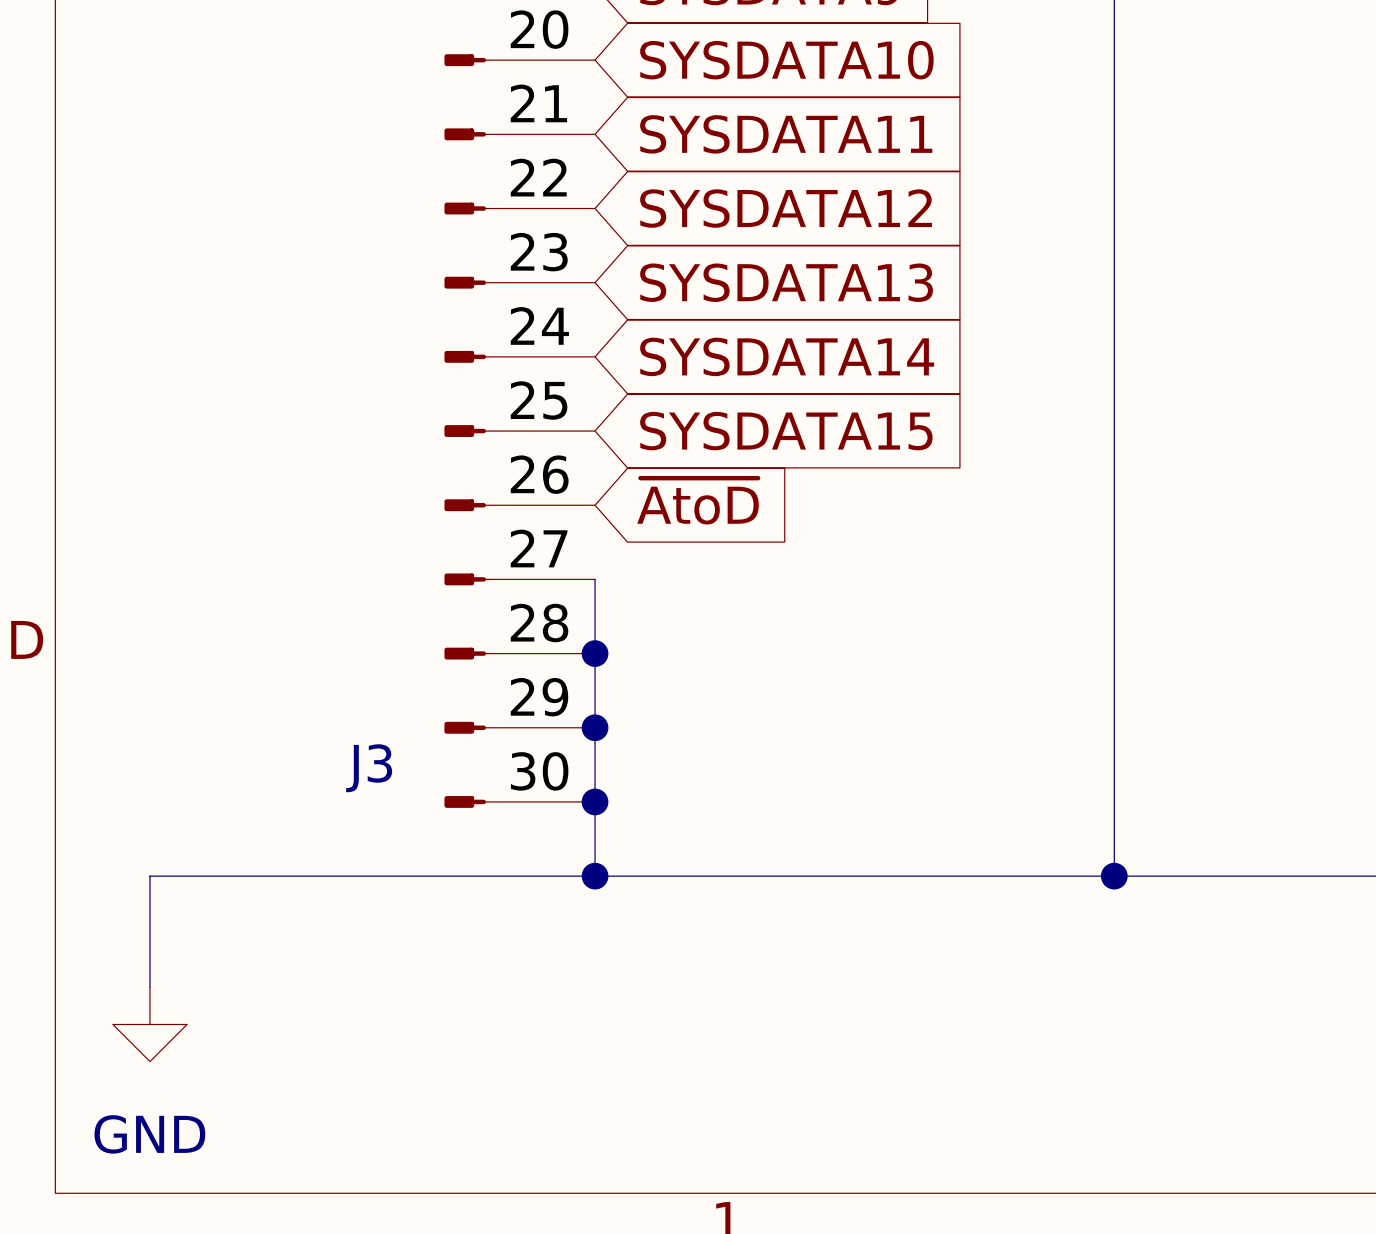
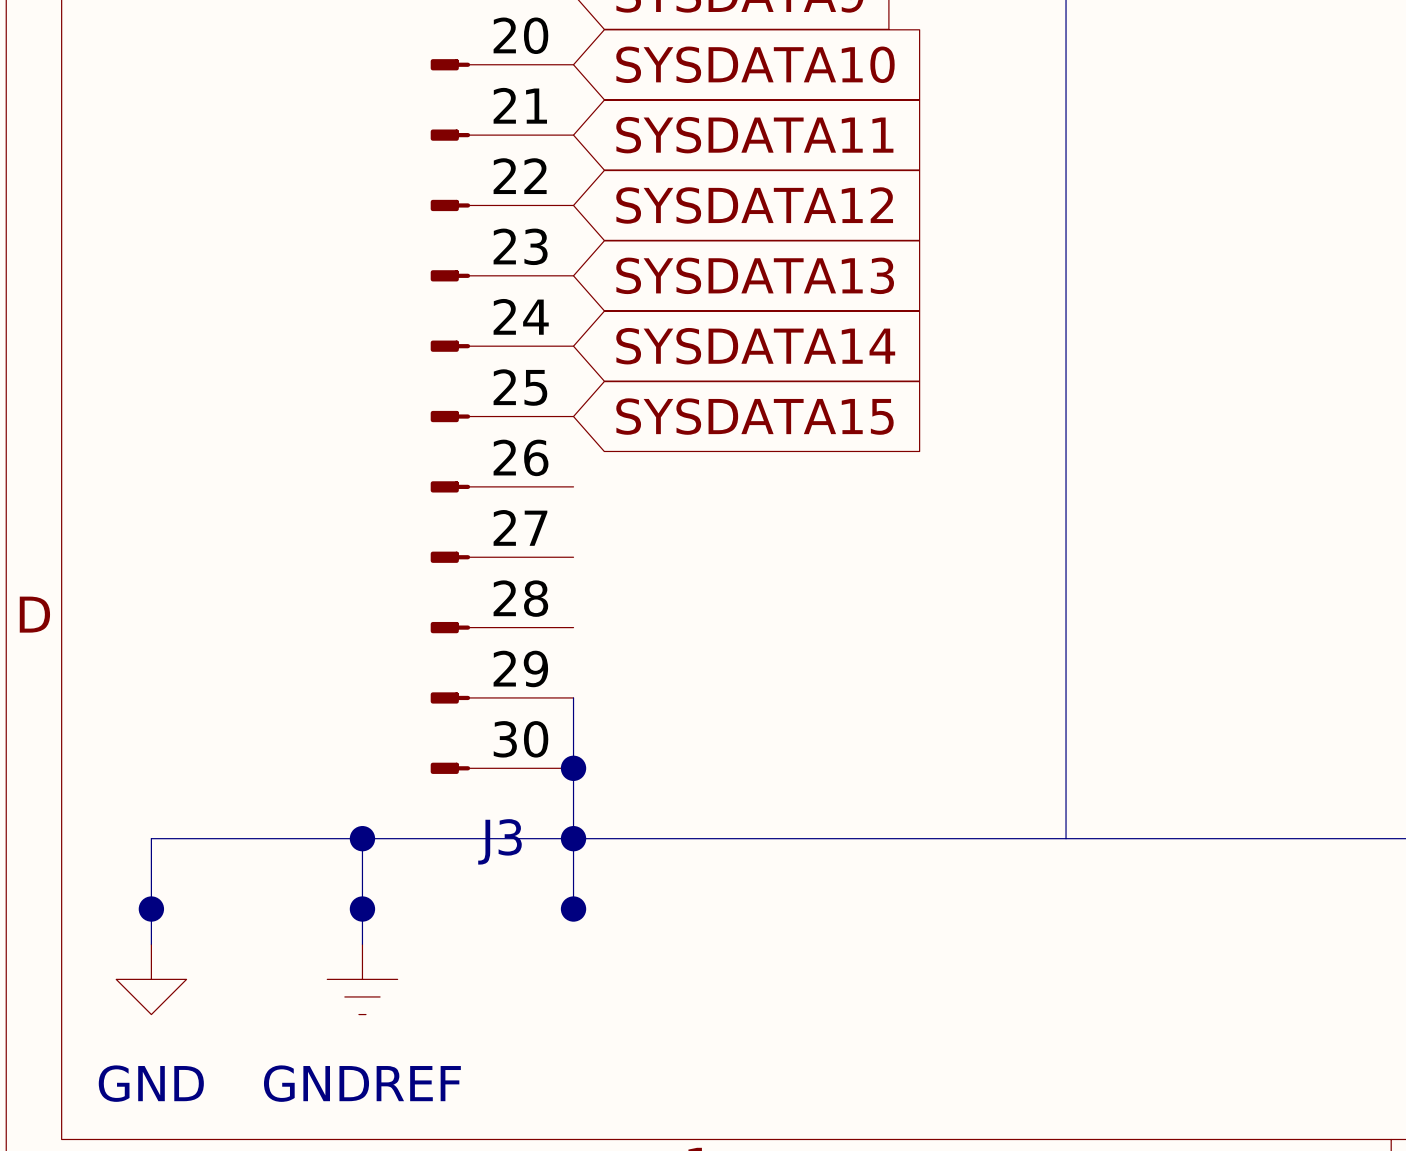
global label: ~{AtoD} (697, 501) -> none
wire: (595, 579) (595, 727) -> none
junction: (595, 653) -> none
junction: (595, 727) -> none
J3 name position: J3 (369, 768) -> J3 (499, 841)
wire: none -> (362, 838) (362, 944)
junction: none -> (362, 838)
wire: none -> (573, 838) (573, 909)
junction: (1114, 876) -> none
junction: none -> (151, 909)
junction: none -> (362, 909)
junction: none -> (573, 909)
power symbol: none -> GNDREF (362, 979)

